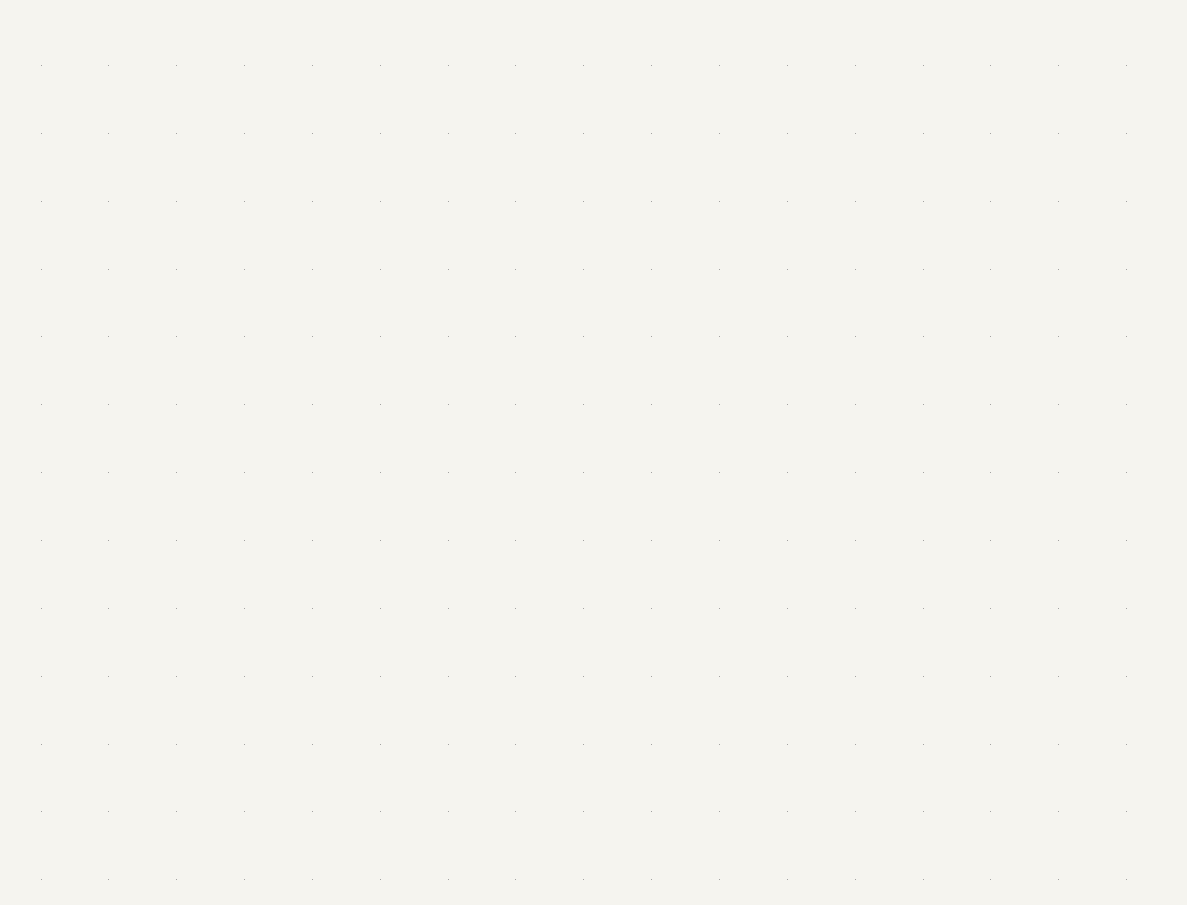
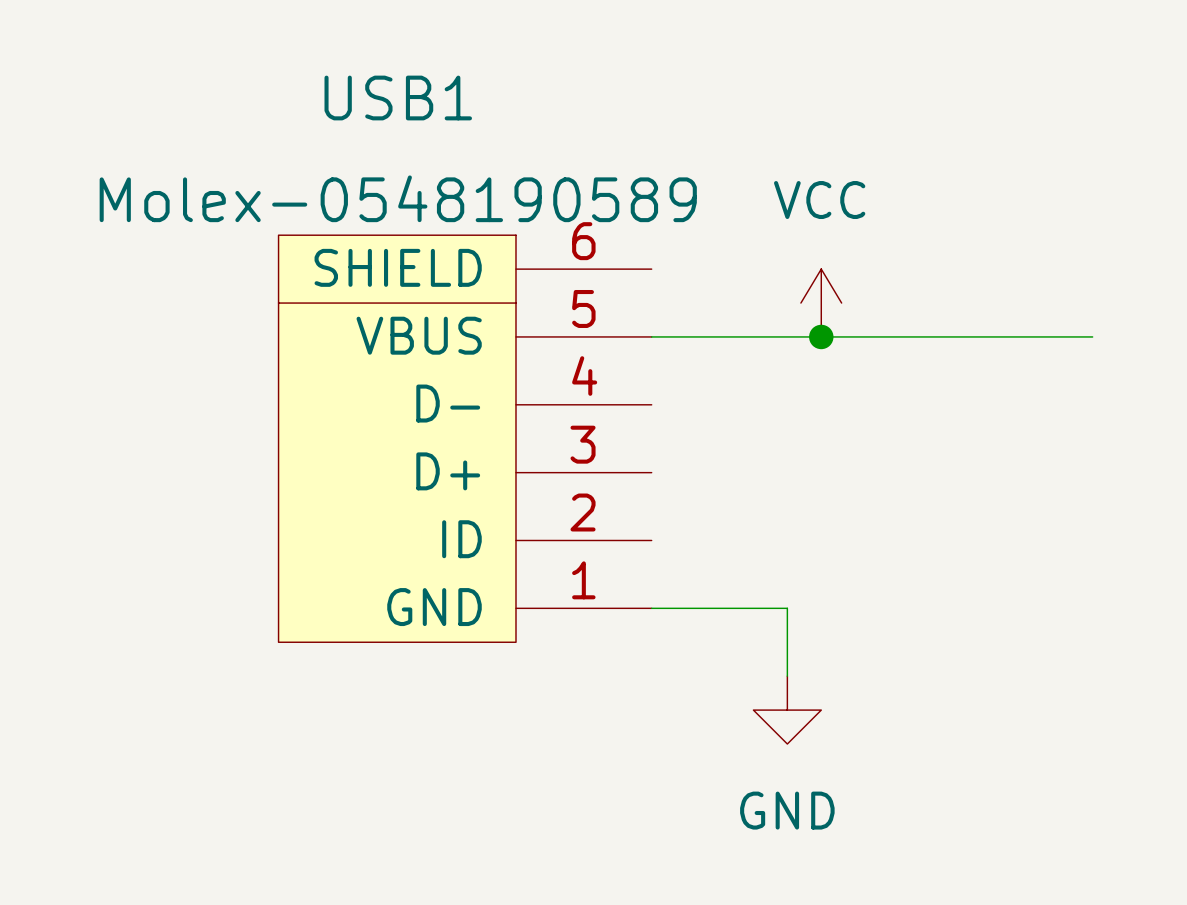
power symbol: none -> VCC (821, 303)
wire: none -> (651, 336) (1092, 336)
junction: none -> (821, 336)
USB1: none -> Molex-0548190589 (465, 438)
wire: none -> (651, 608) (787, 608) (787, 676)
power symbol: none -> GND (787, 710)

